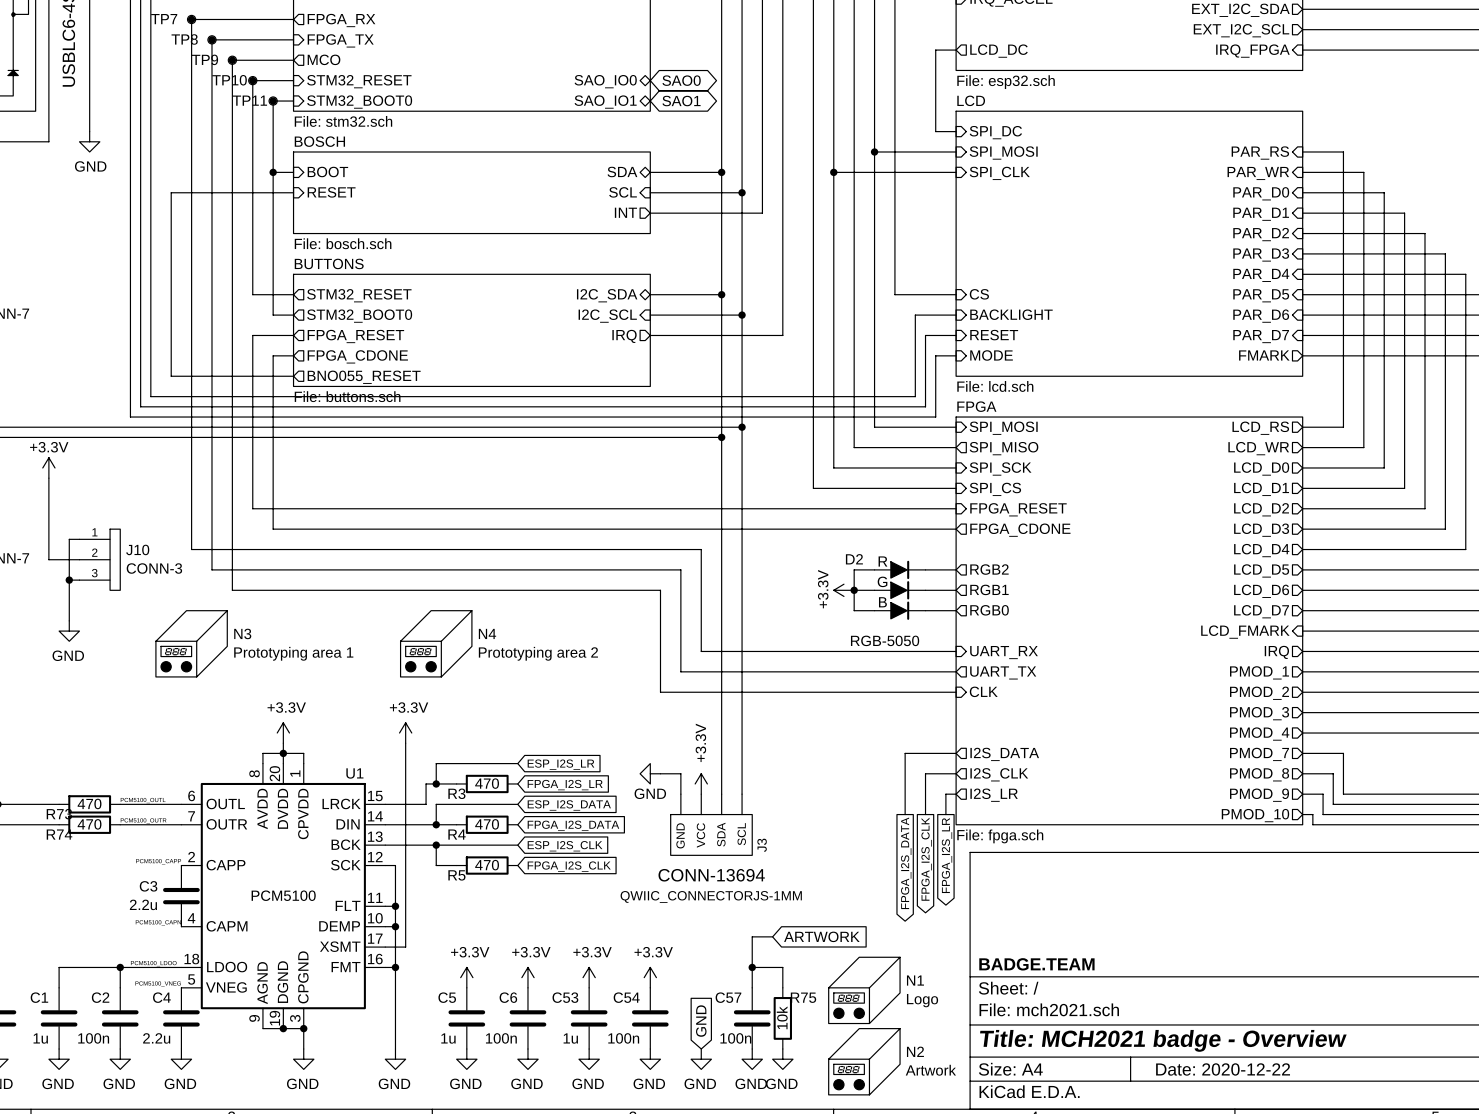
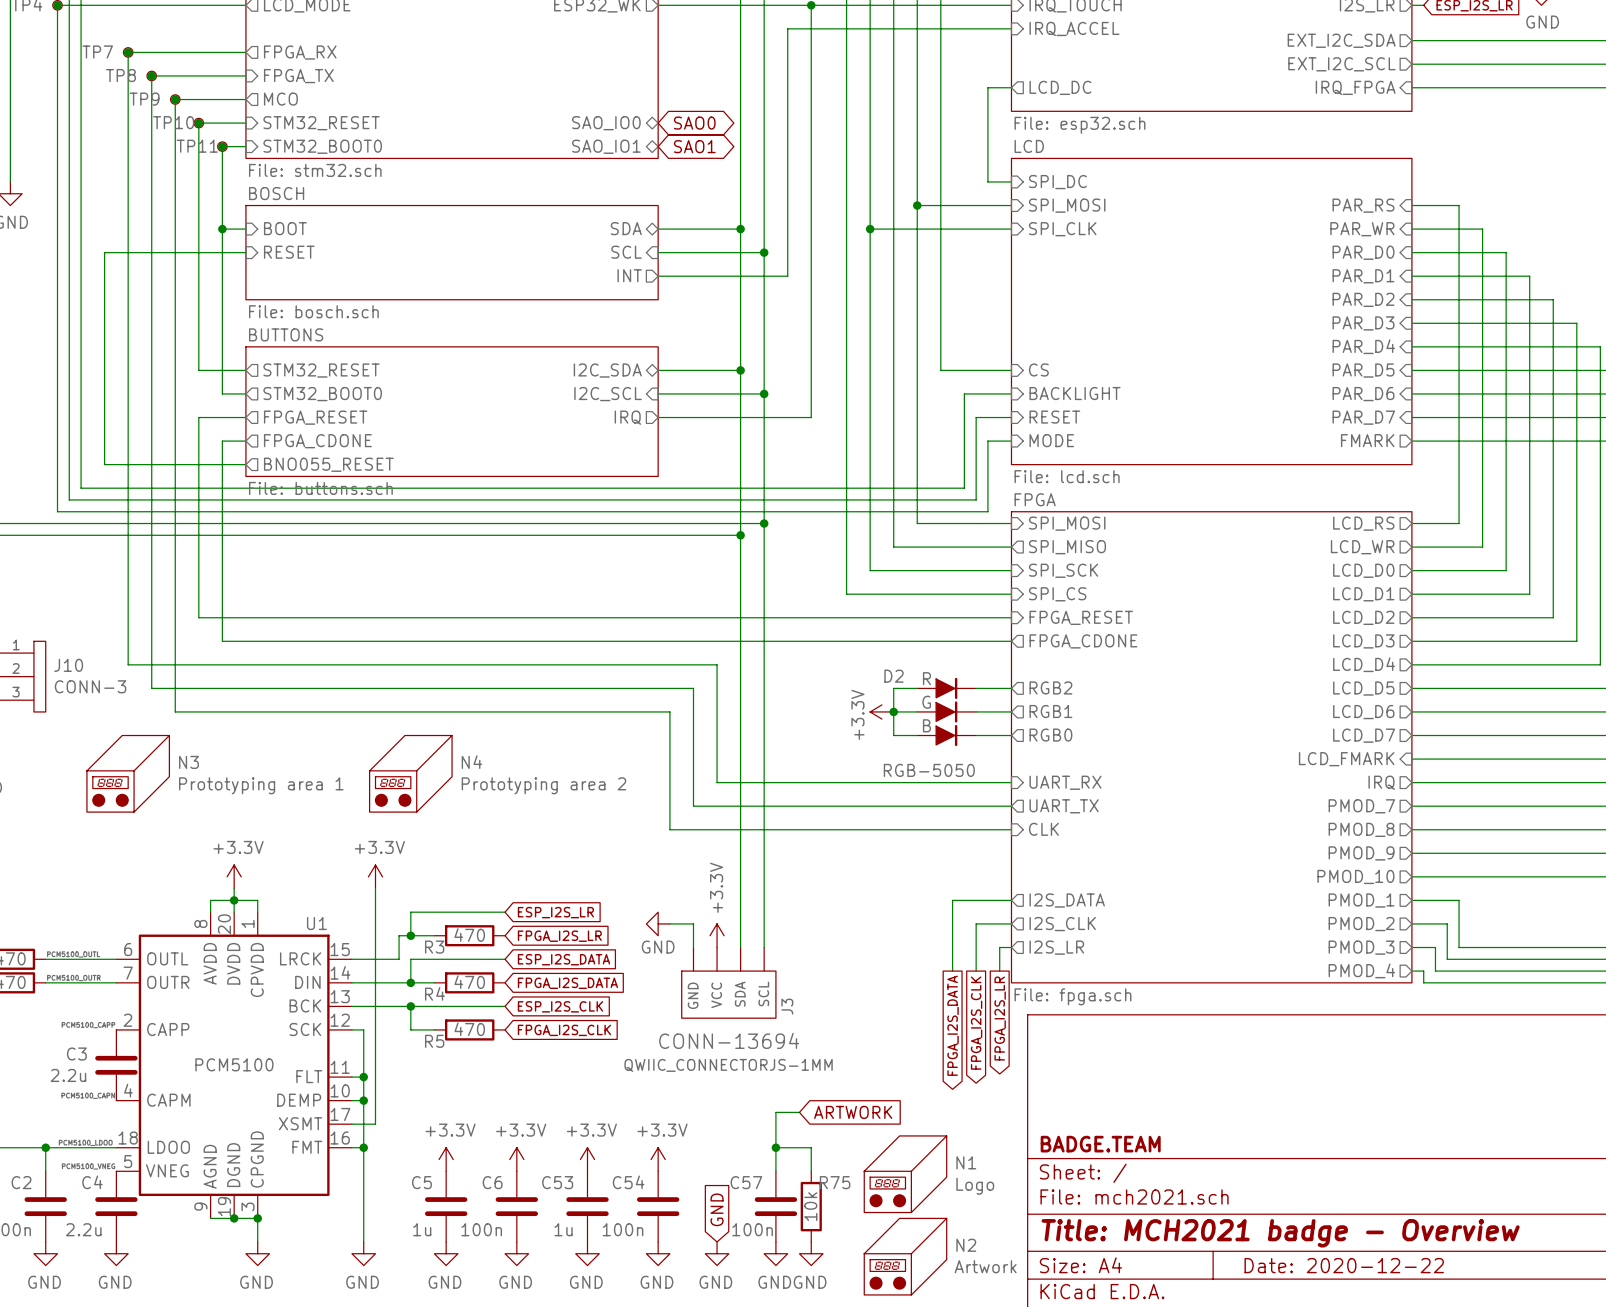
sheet pin: PMOD_1 (1259, 672) -> PMOD_7 (1361, 806)
sheet pin: PMOD_2 (1259, 693) -> PMOD_8 (1361, 829)
sheet pin: PMOD_3 (1259, 713) -> PMOD_9 (1361, 853)
sheet pin: PMOD_4 (1259, 734) -> PMOD_10 (1355, 876)
sheet pin: PMOD_7 (1259, 754) -> PMOD_1 (1361, 900)
sheet pin: PMOD_8 (1259, 774) -> PMOD_2 (1361, 924)
sheet pin: PMOD_9 (1259, 795) -> PMOD_3 (1361, 947)
sheet pin: PMOD_10 (1255, 815) -> PMOD_4 (1361, 970)

